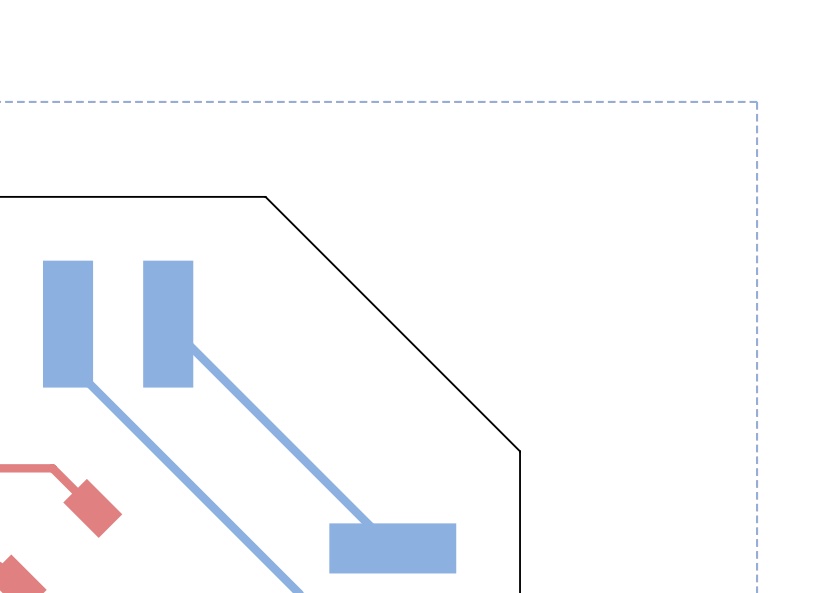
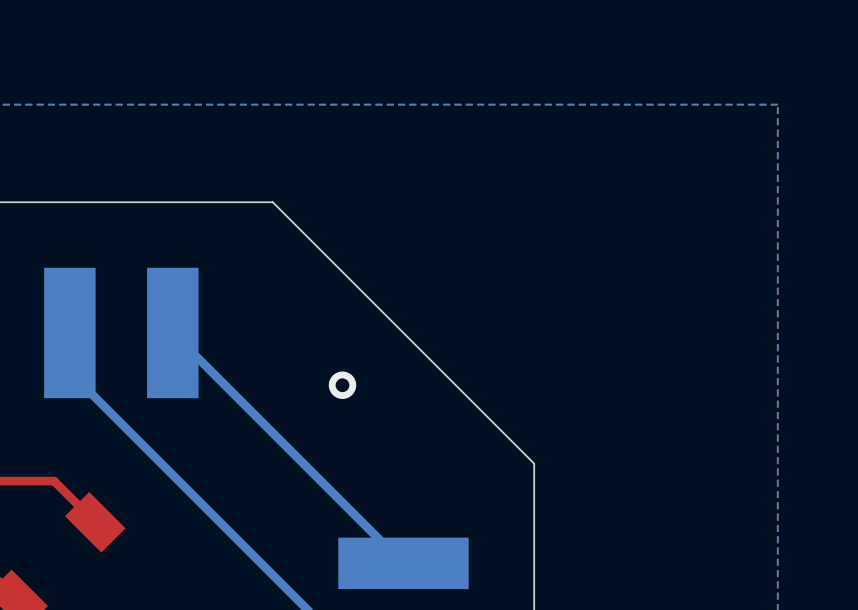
via: none -> (342, 385)

